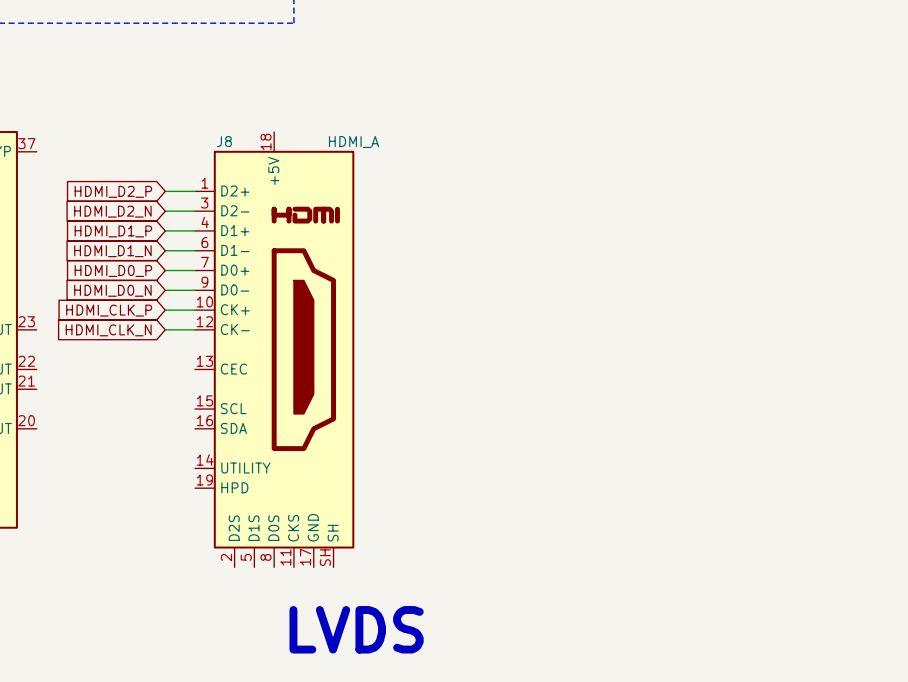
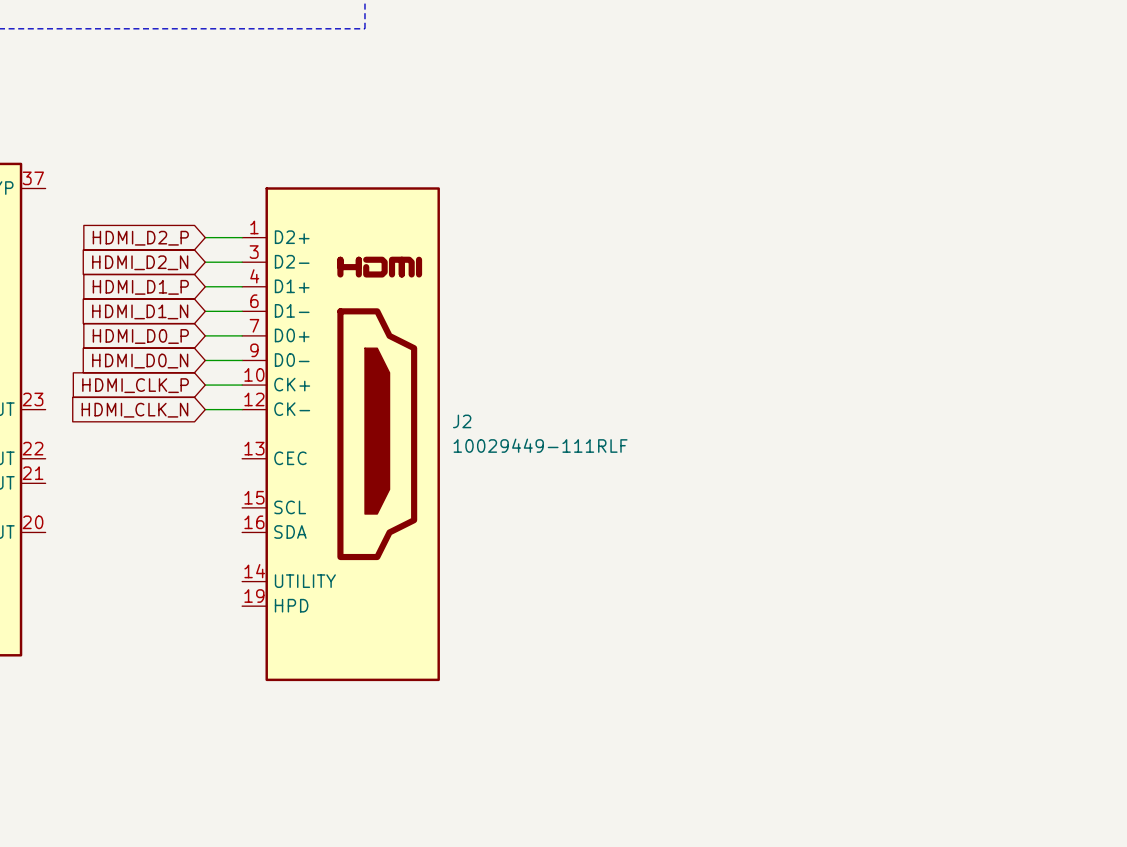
J8: HDMI_A (274, 349) -> none
J2: none -> 10029449-111RLF (341, 434)
text: LVDS (356, 629) -> none

